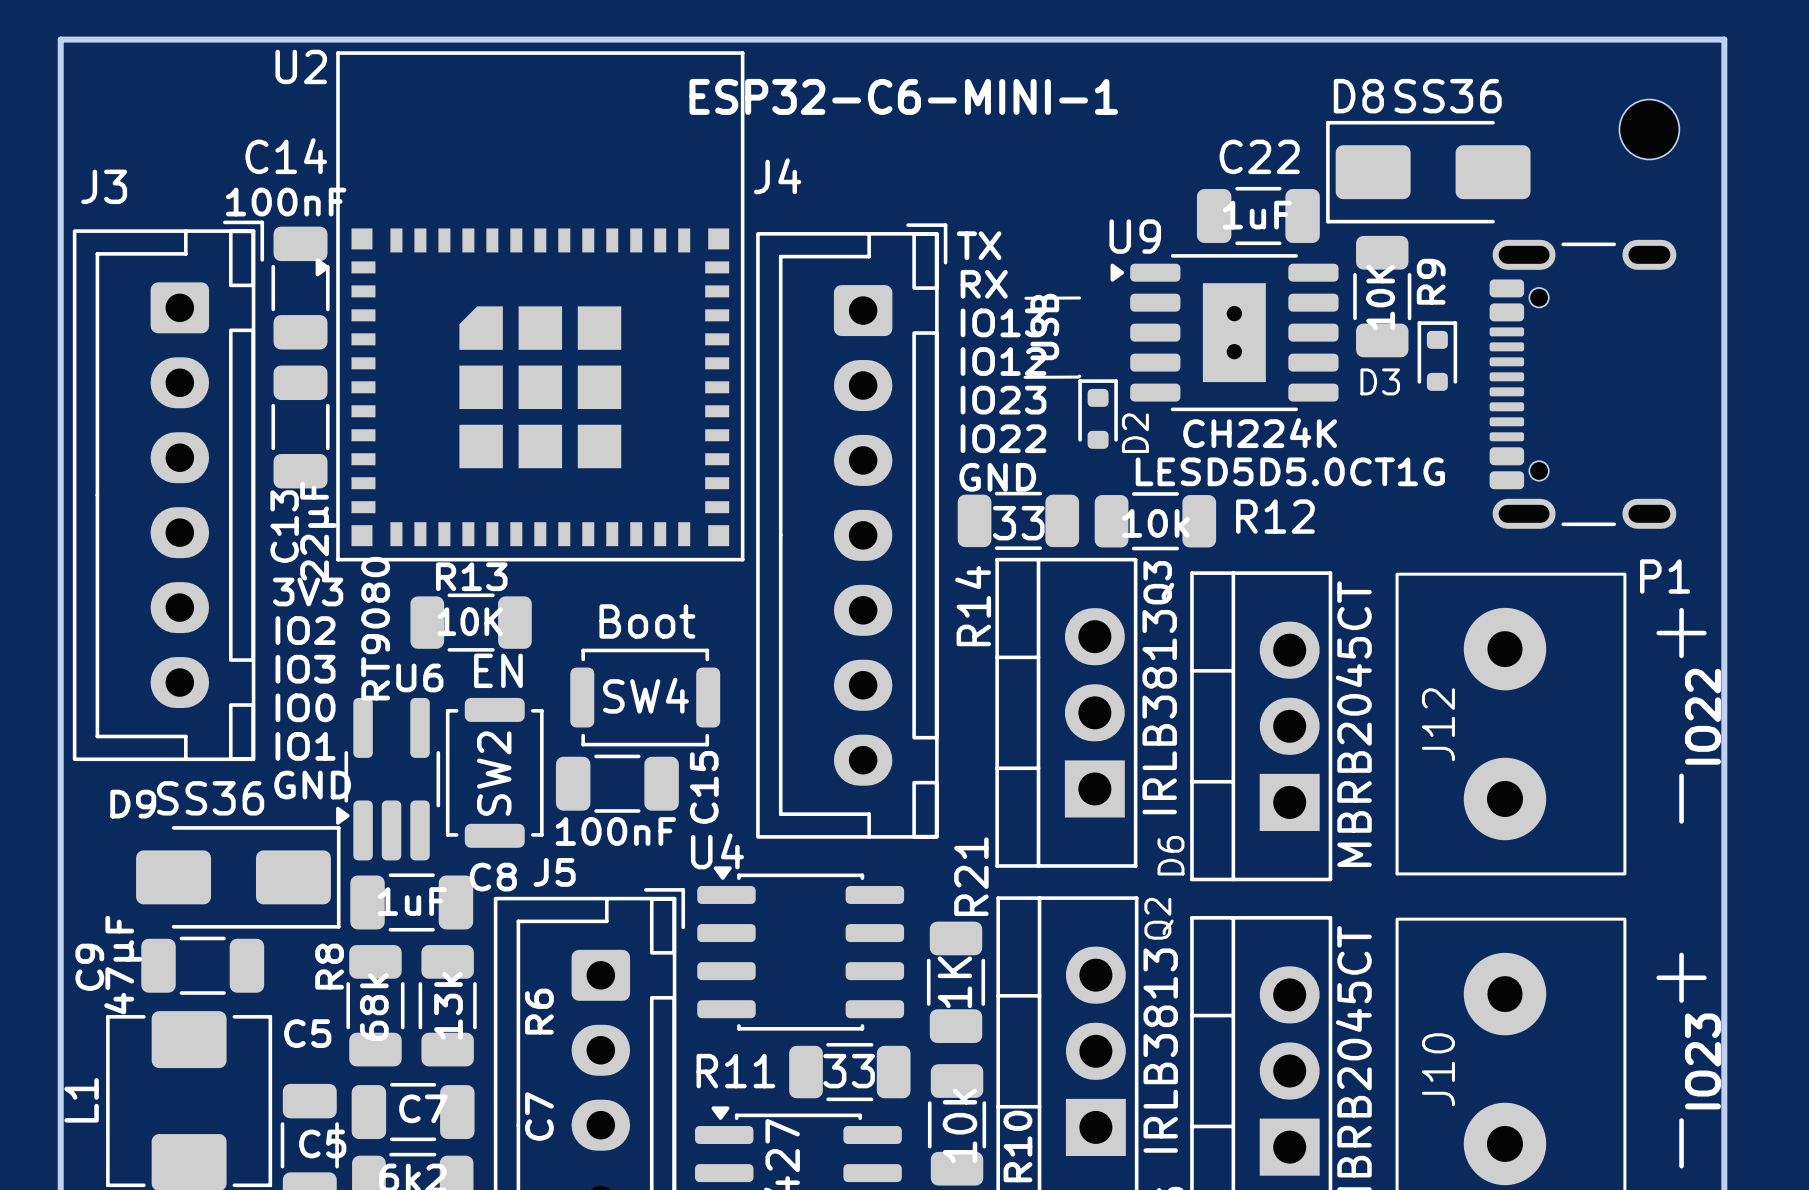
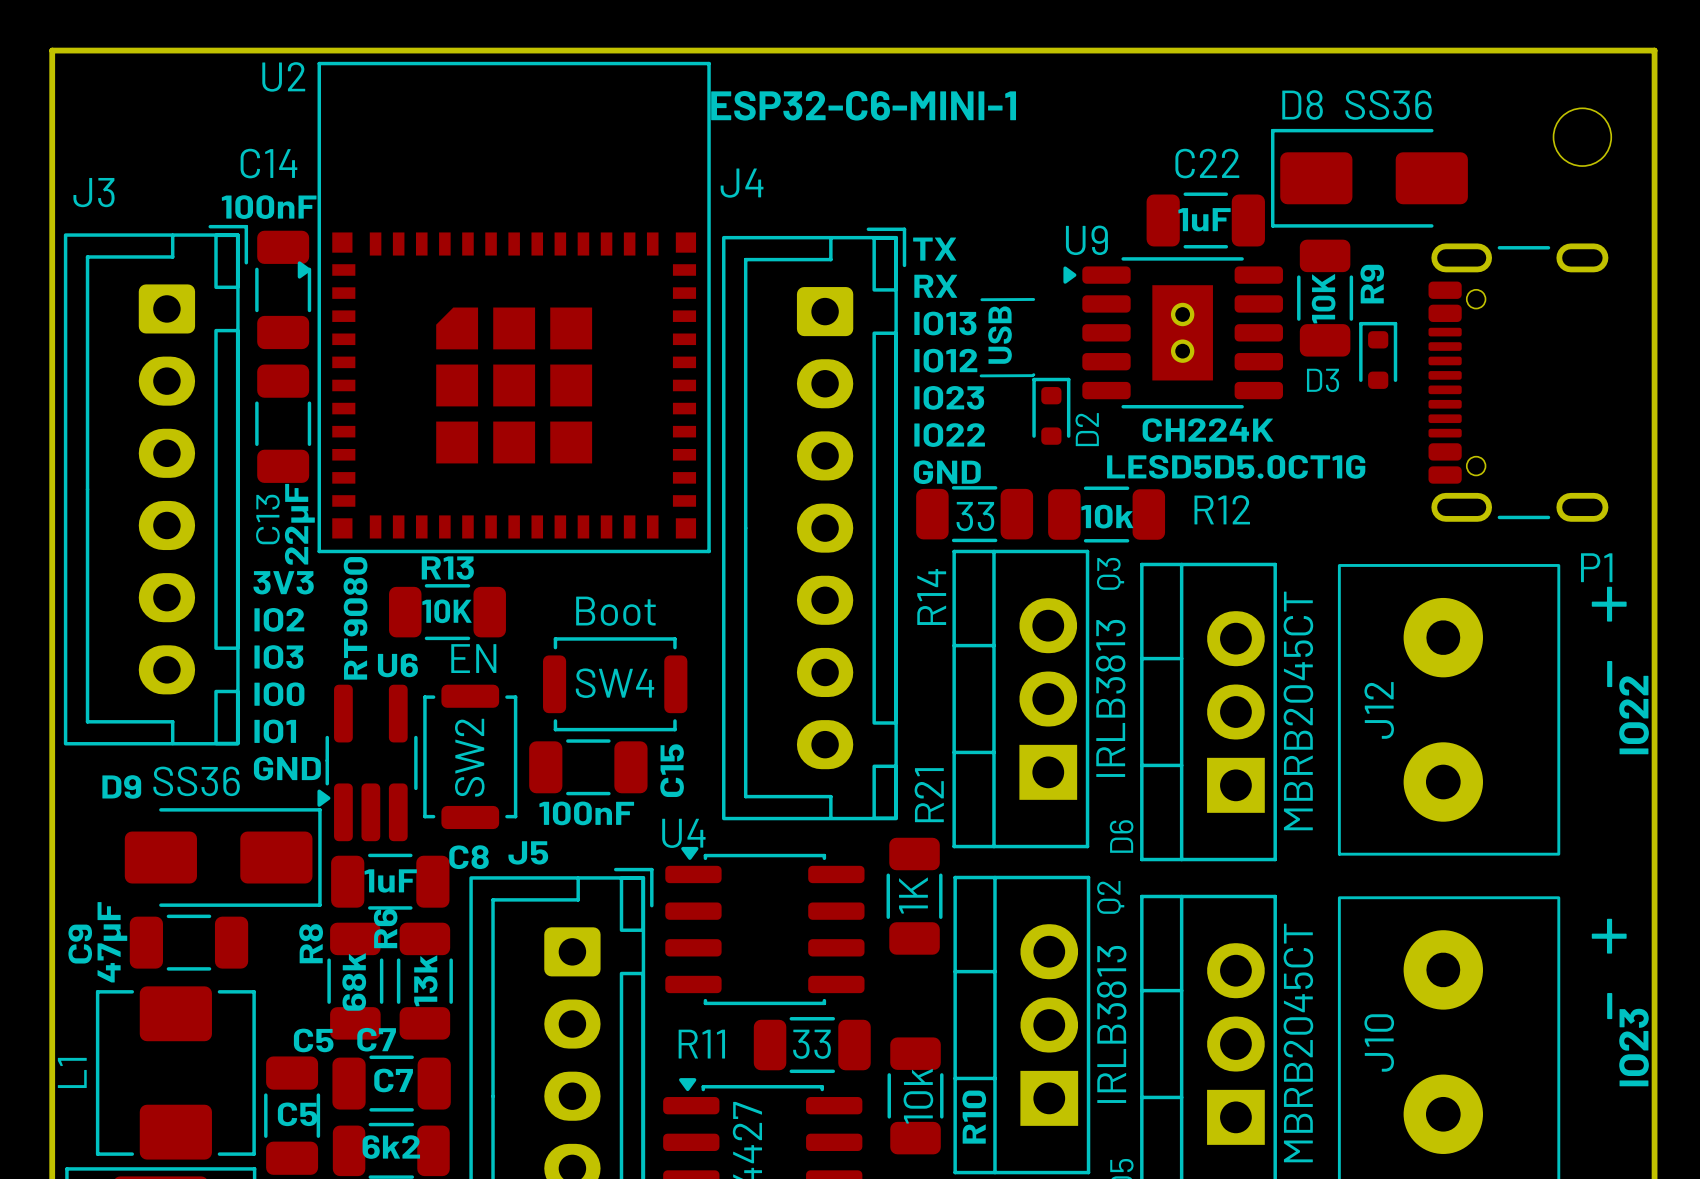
R21 position: (956, 982) -> (914, 896)
R6 name position: R6 (539, 1011) -> R6 (385, 928)
C5 name position: C5 (307, 1033) -> C5 (313, 1040)
C7 name rotation: 0° (539, 1116) -> 90° clockwise (376, 1039)
C7 name position: C7 (539, 1116) -> C7 (376, 1039)

